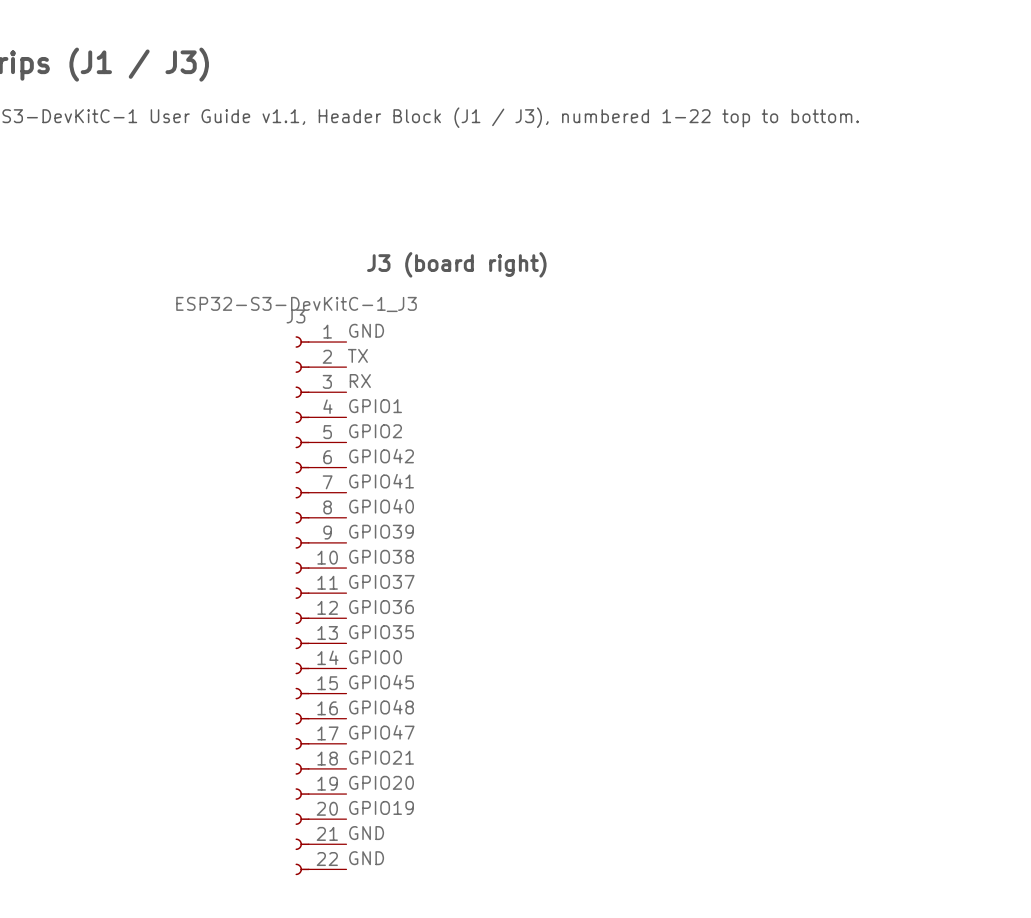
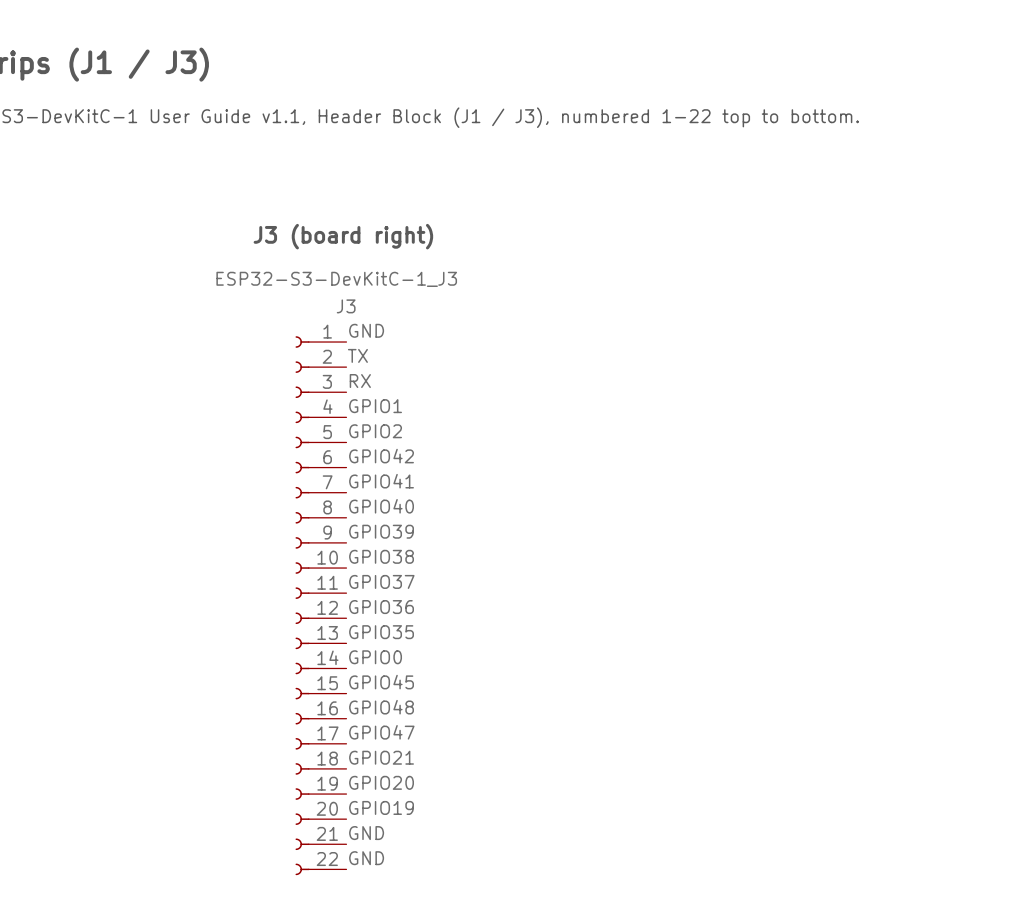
text position: J3 (board right) (456, 264) -> J3 (board right) (343, 236)
J3 value position: ESP32-S3-DevKitC-1_J3 (296, 304) -> ESP32-S3-DevKitC-1_J3 (336, 279)
J3 name position: J3 (295, 316) -> J3 (346, 306)

